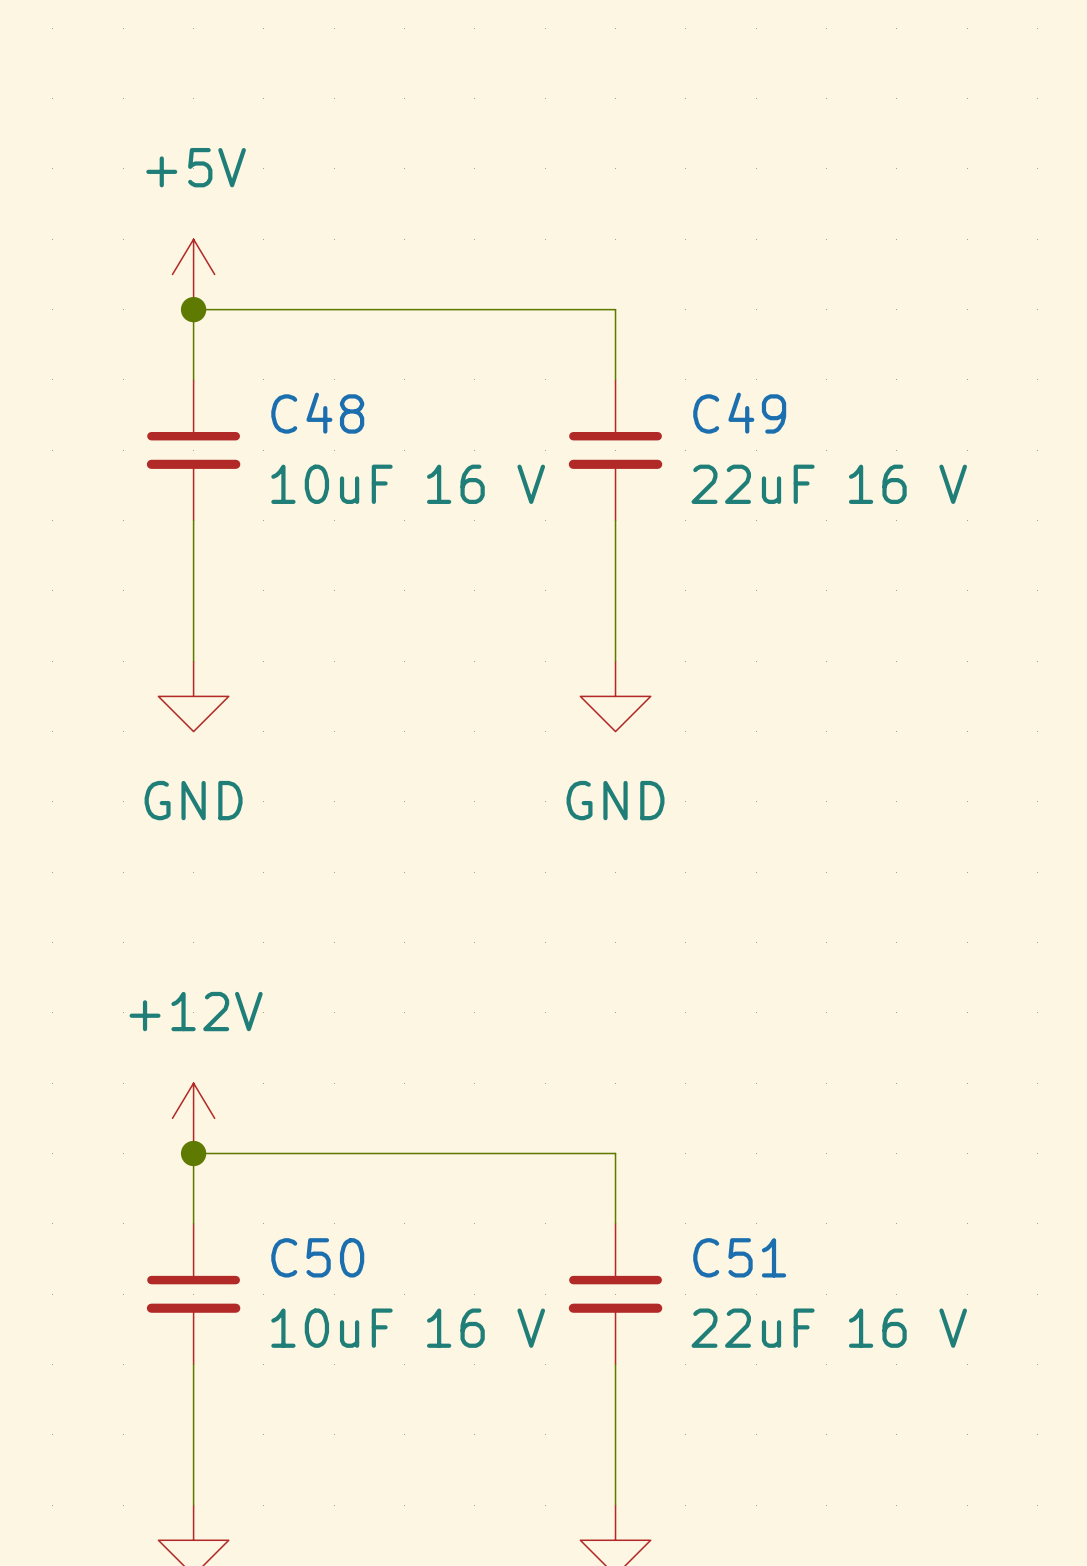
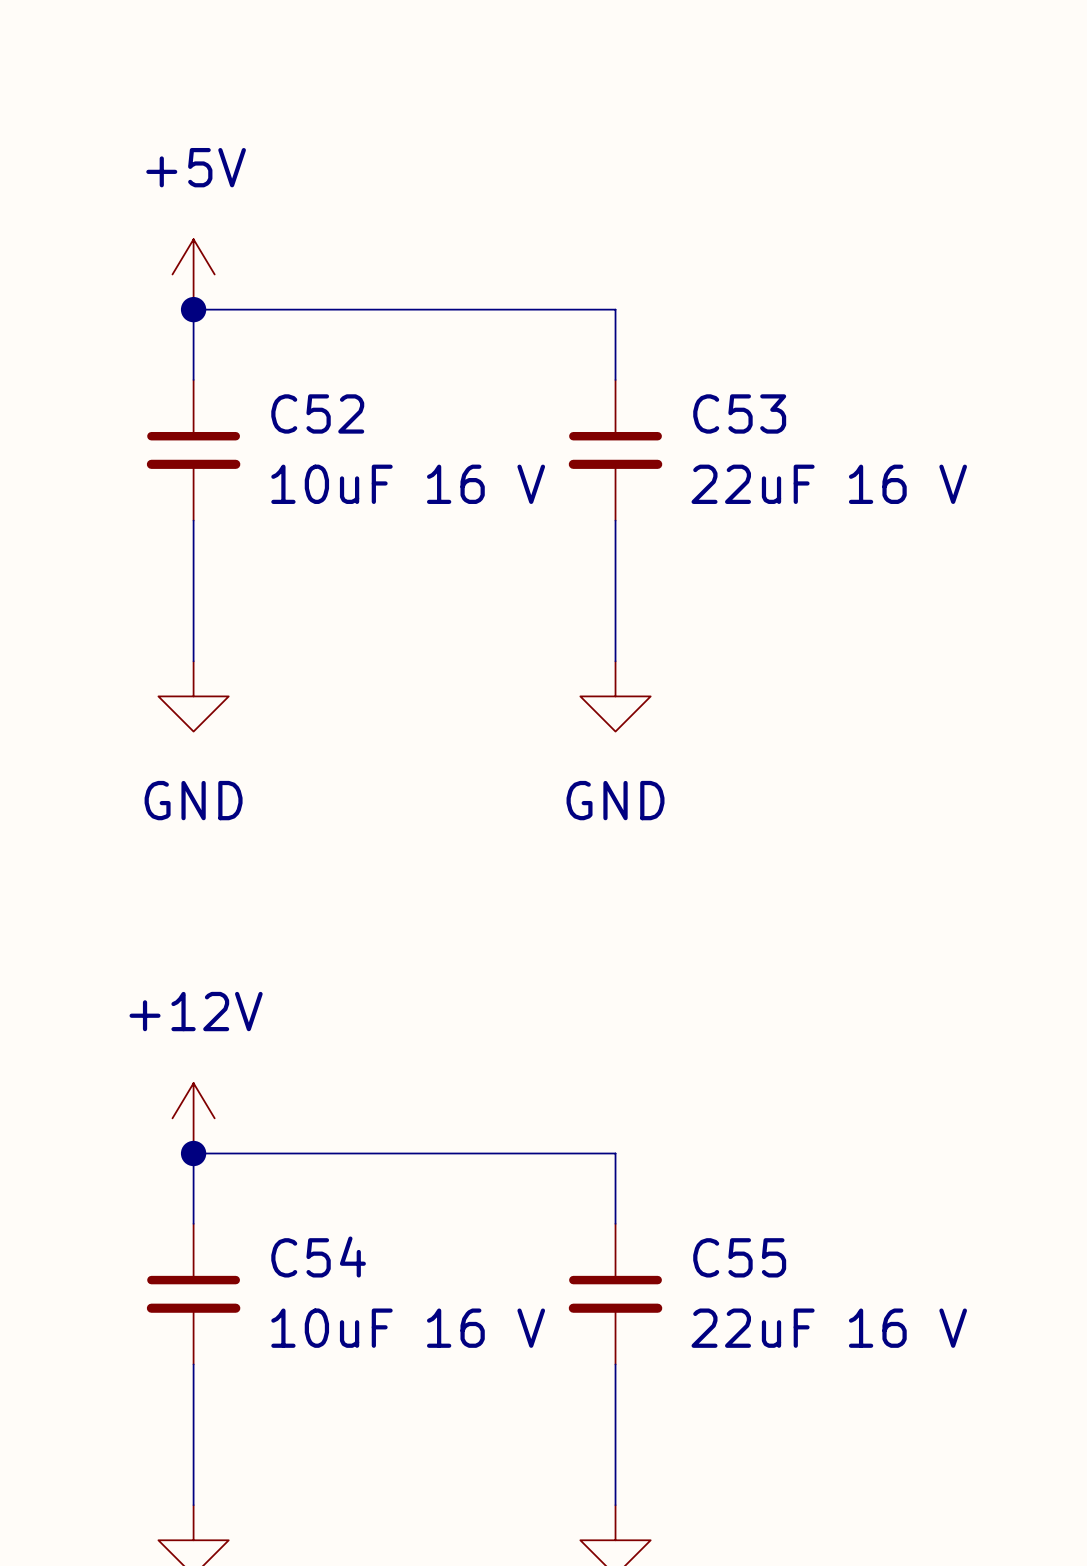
C48 name: C48 (317, 413) -> C52 (317, 413)
C49 name: C49 (739, 413) -> C53 (739, 413)
C50 name: C50 (317, 1257) -> C54 (318, 1257)
C51 name: C51 (739, 1257) -> C55 (739, 1257)

